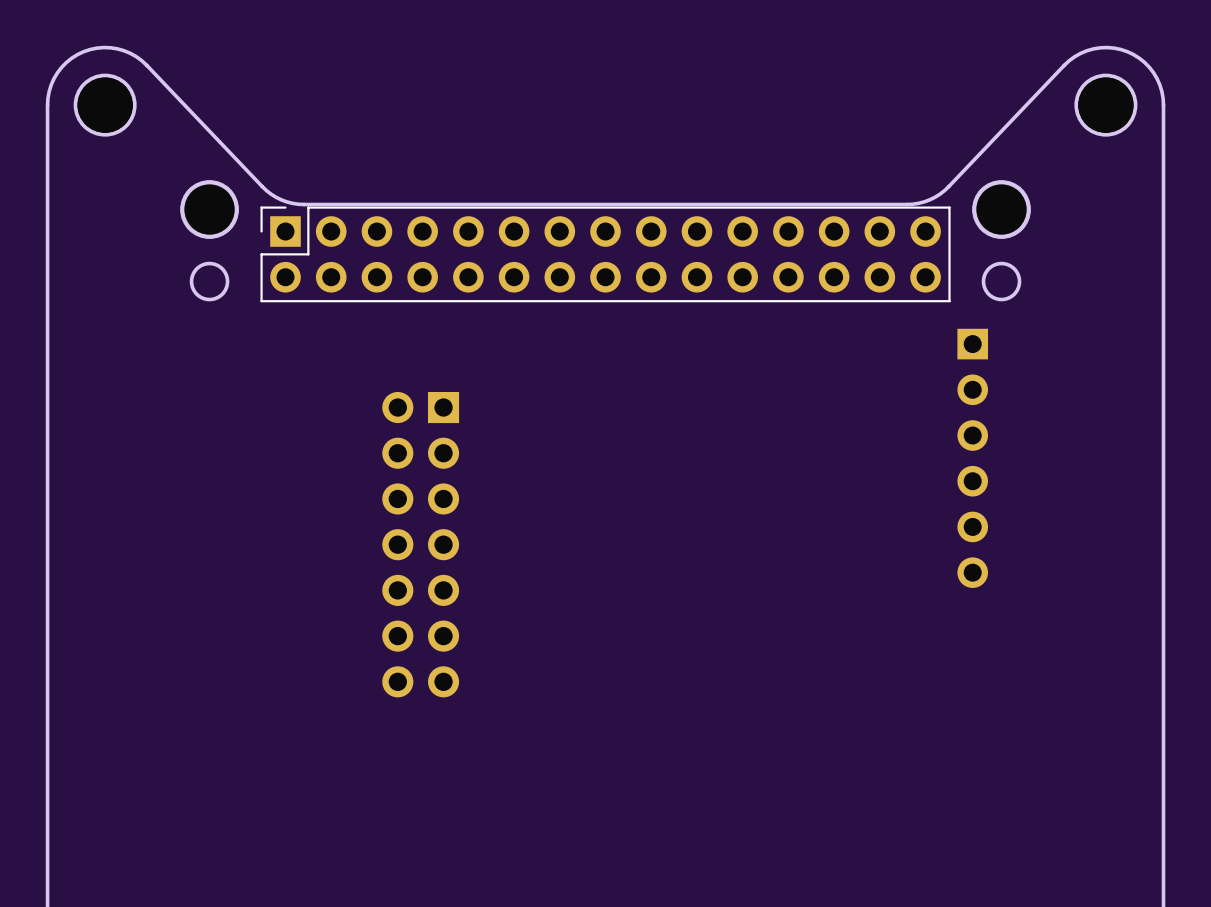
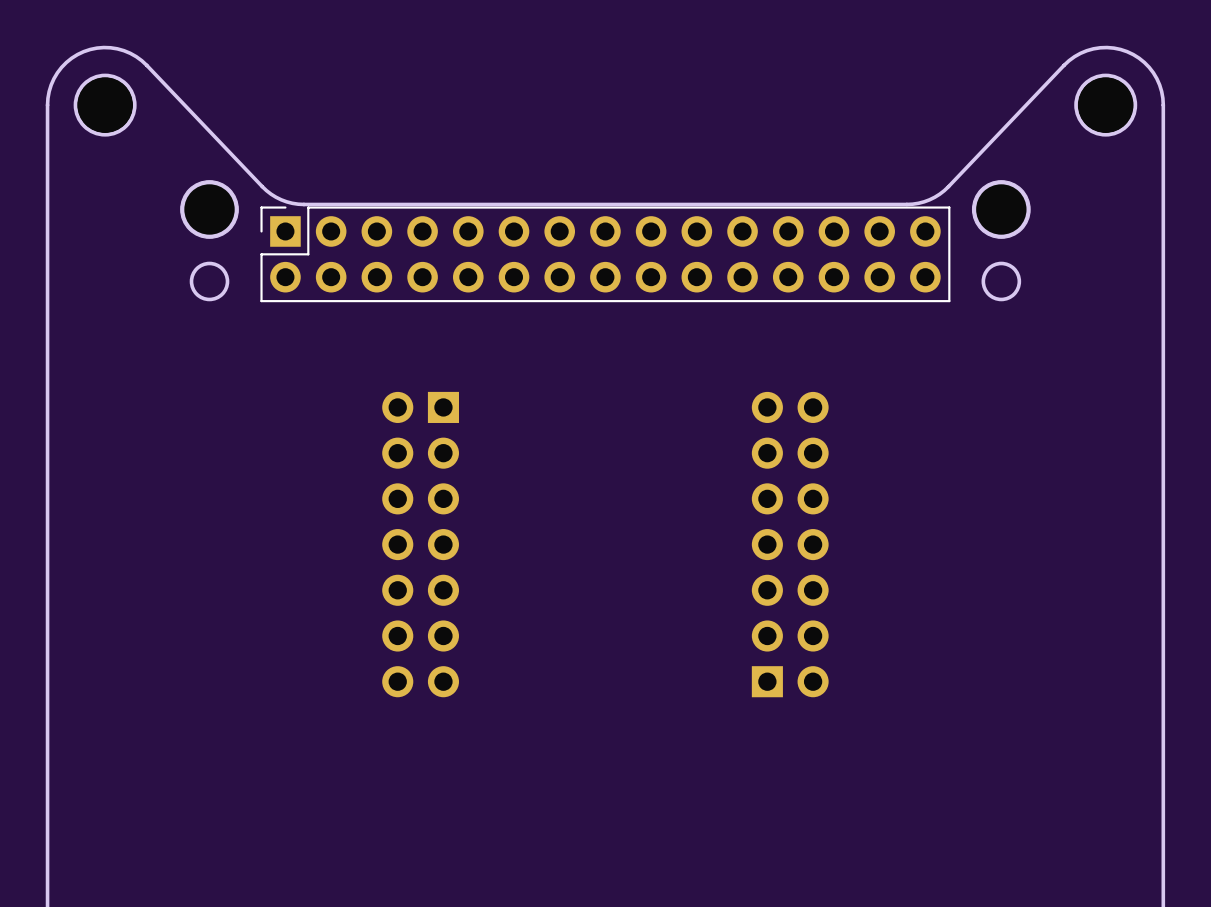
part: (972, 458) -> none
part: none -> (790, 544)

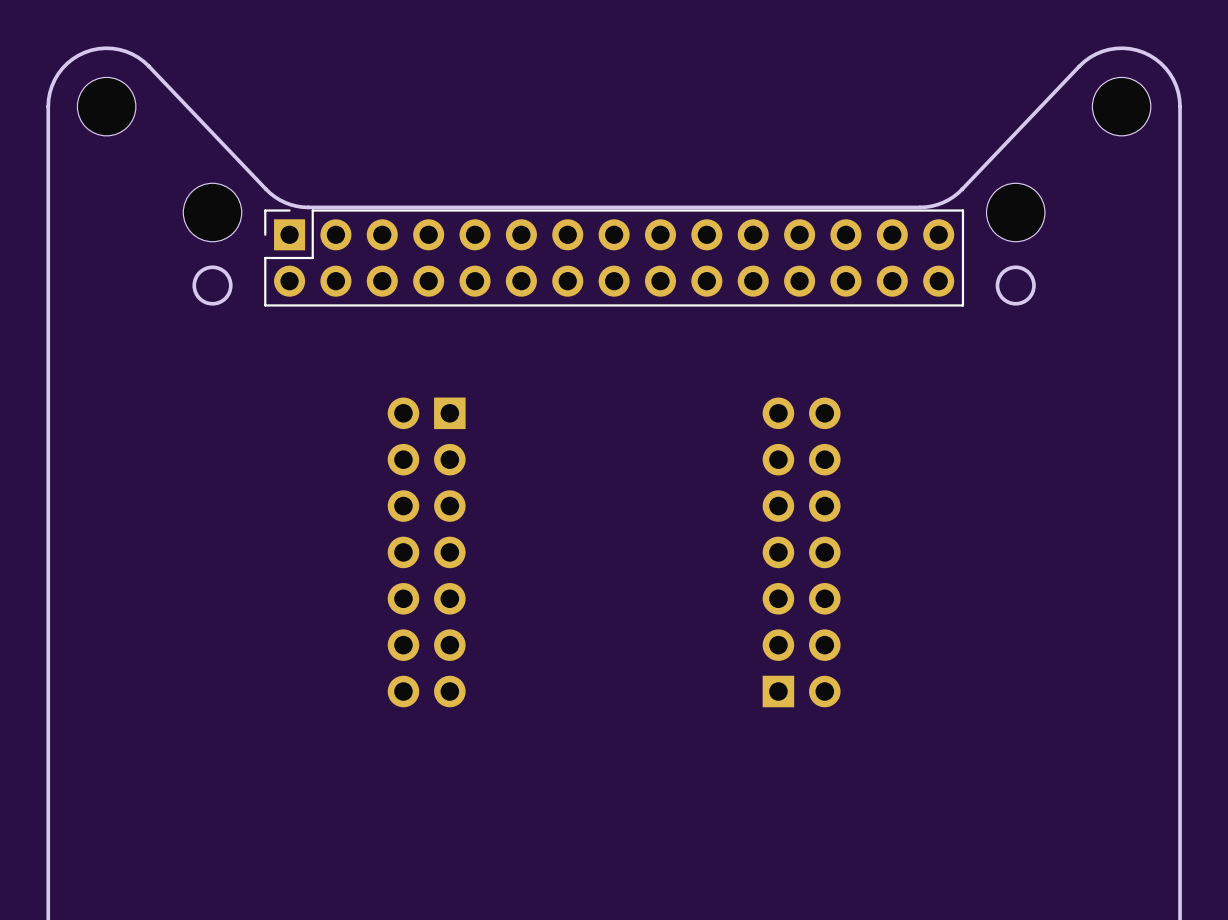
round board edge: [73, 73, 137, 137] -> none
round board edge: [1074, 73, 1138, 137] -> none
round board edge: [180, 180, 239, 239] -> none
round board edge: [972, 180, 1031, 239] -> none

